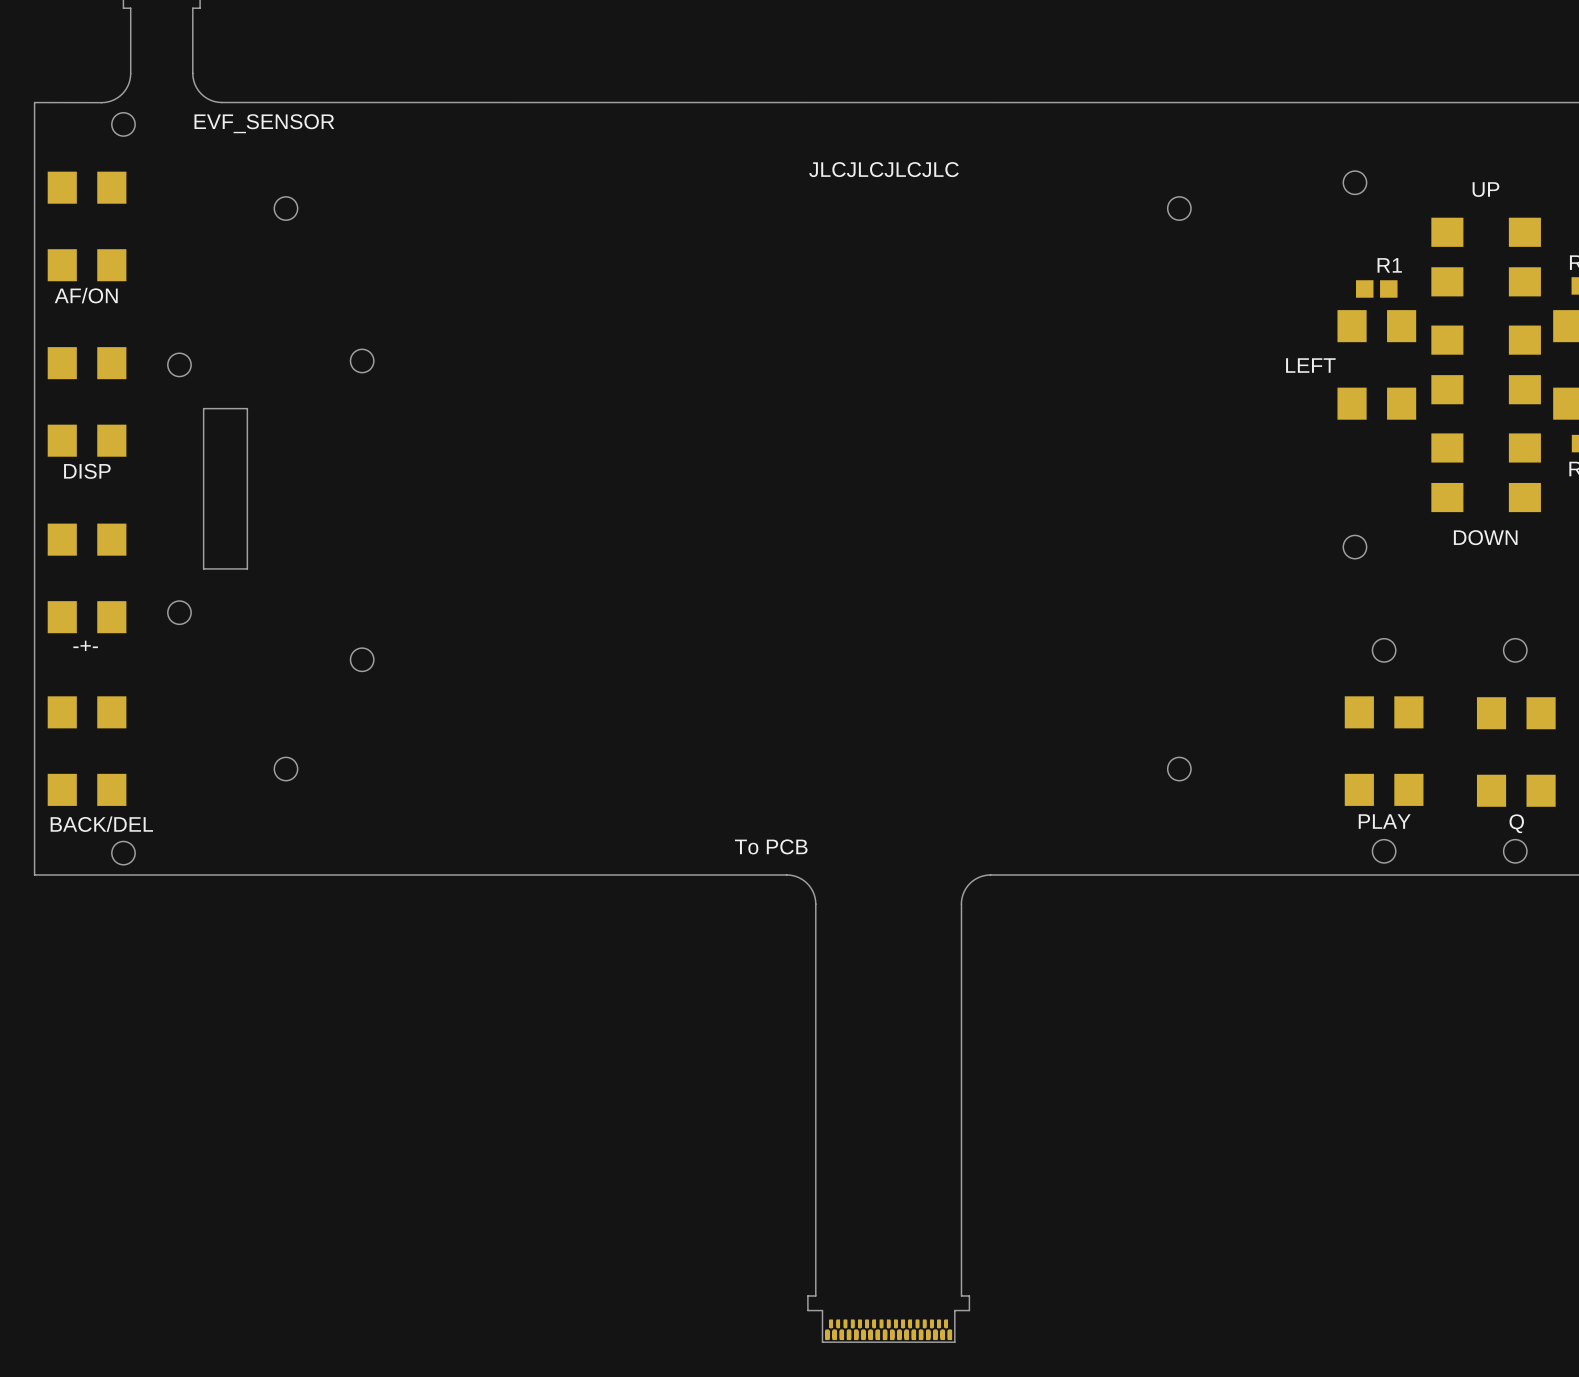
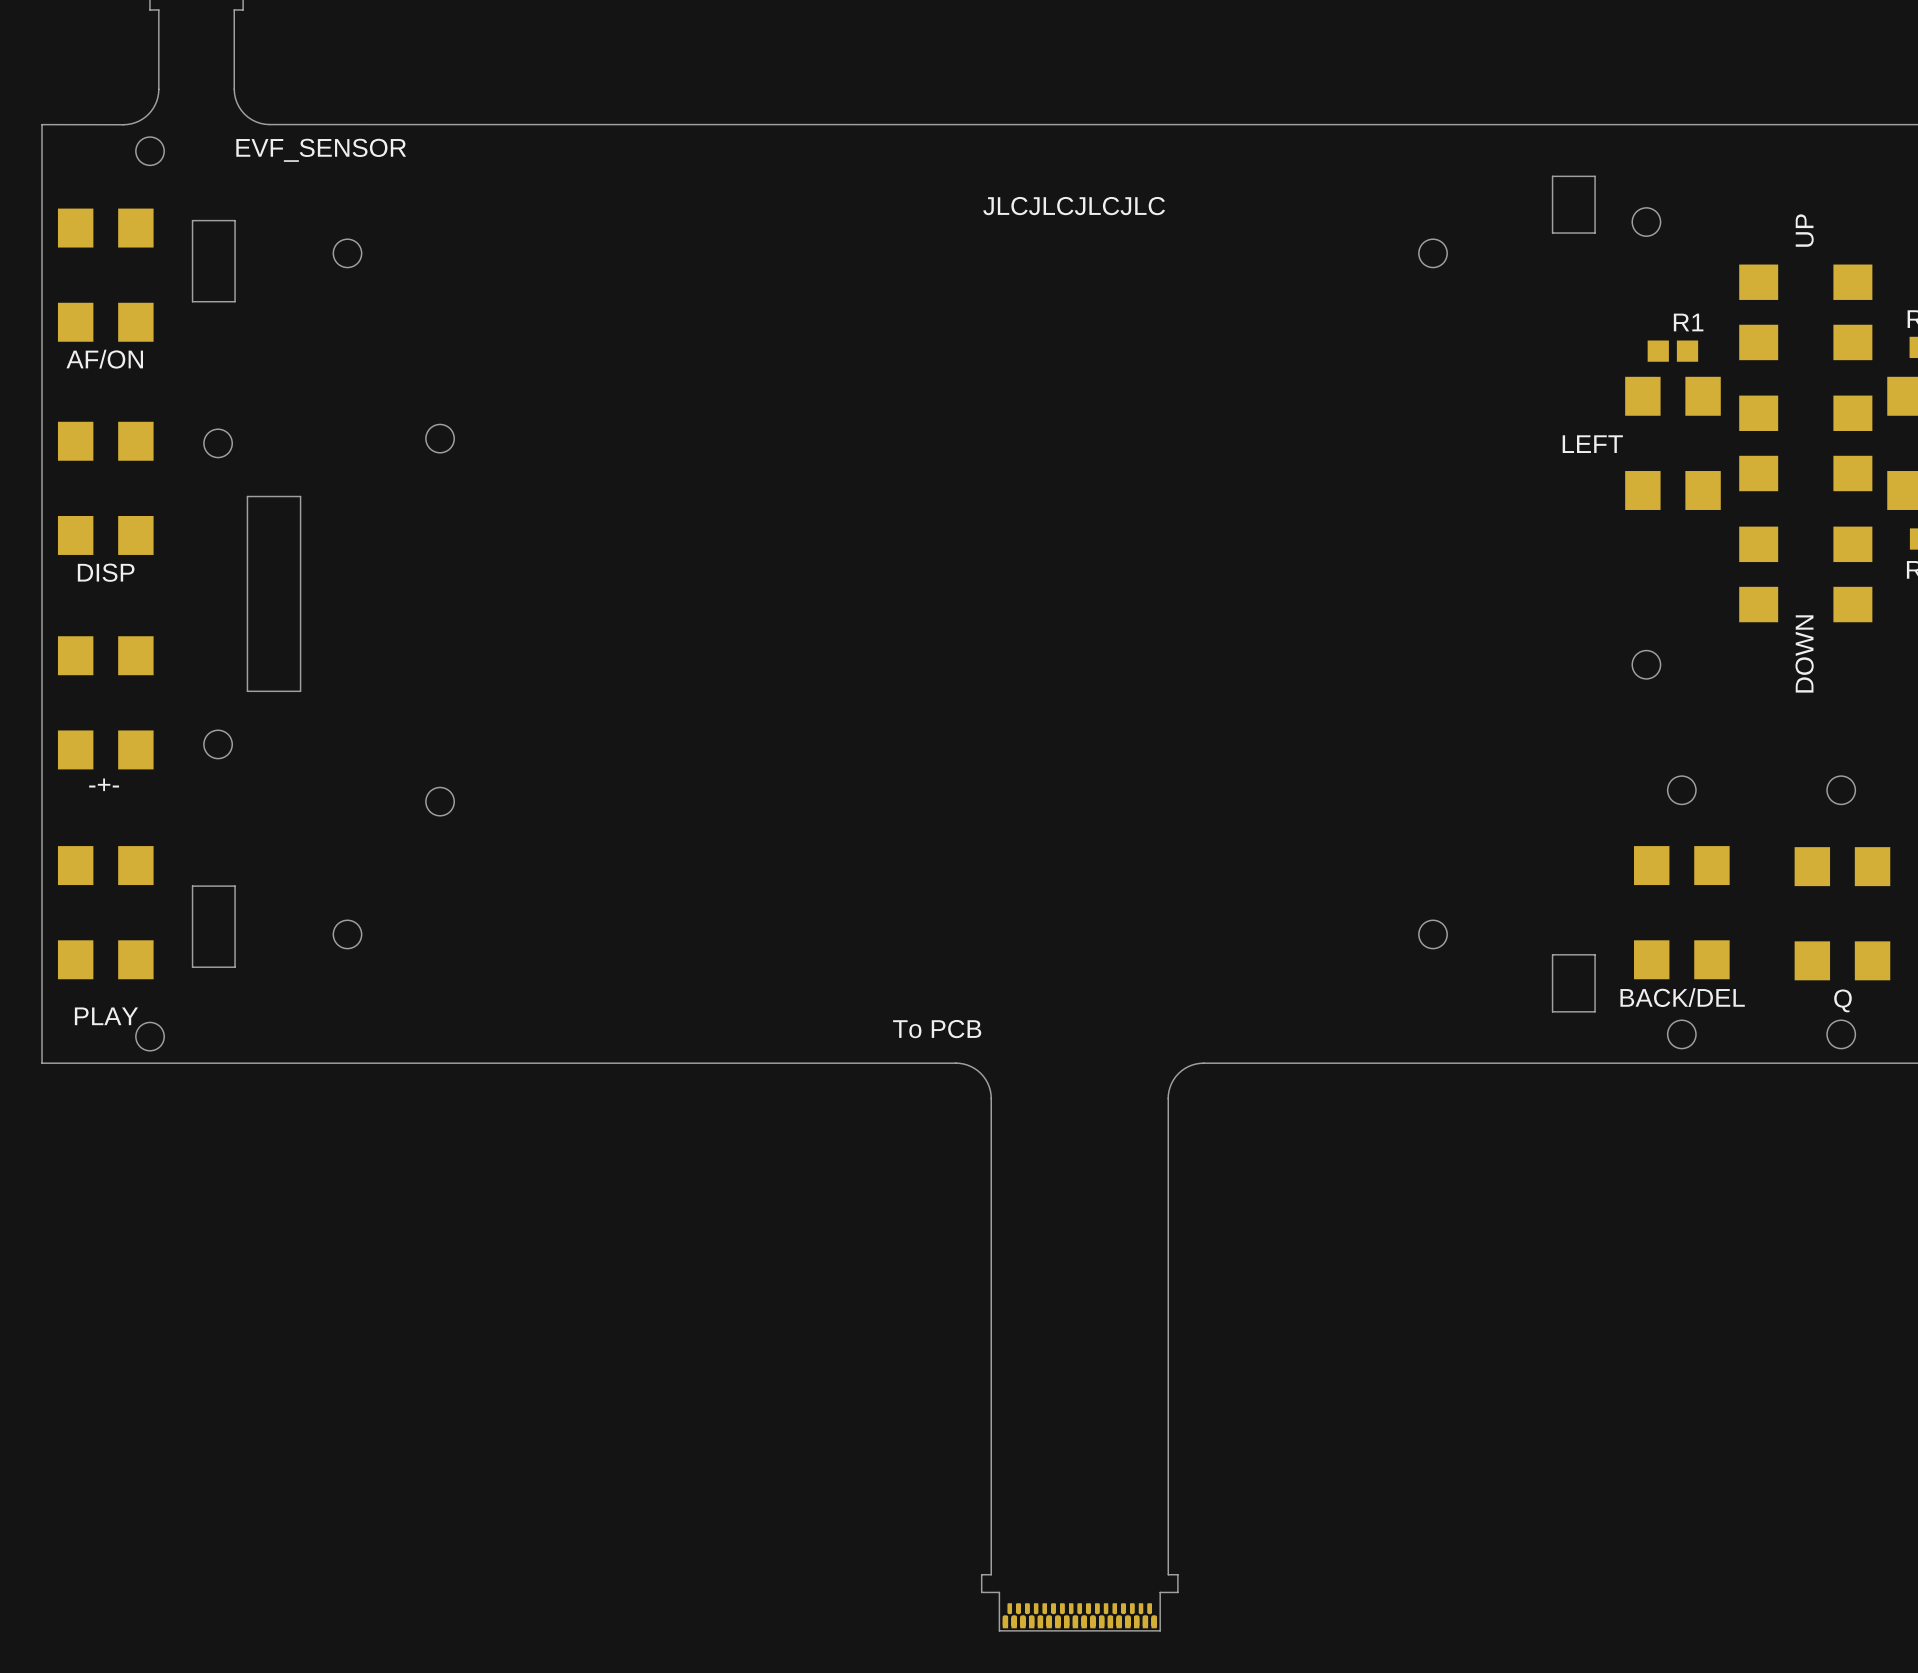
board edge: none -> (1552, 176) (1552, 233) (1595, 233) (1595, 176) (1552, 176)
board edge: none -> (192, 220) (235, 220) (235, 301) (192, 301) (192, 220)
part value rotation: 0° (1485, 189) -> 90° counterclockwise (1804, 230)
part value rotation: 0° (1485, 537) -> 90° counterclockwise (1804, 653)
board edge: none -> (192, 886) (192, 967) (235, 967) (235, 886) (192, 886)
board edge: none -> (1552, 954) (1595, 954) (1595, 1011) (1552, 1011) (1552, 954)
part value: PLAY (1384, 821) -> BACK/DEL (1682, 997)
part value: BACK/DEL (101, 824) -> PLAY (106, 1016)

